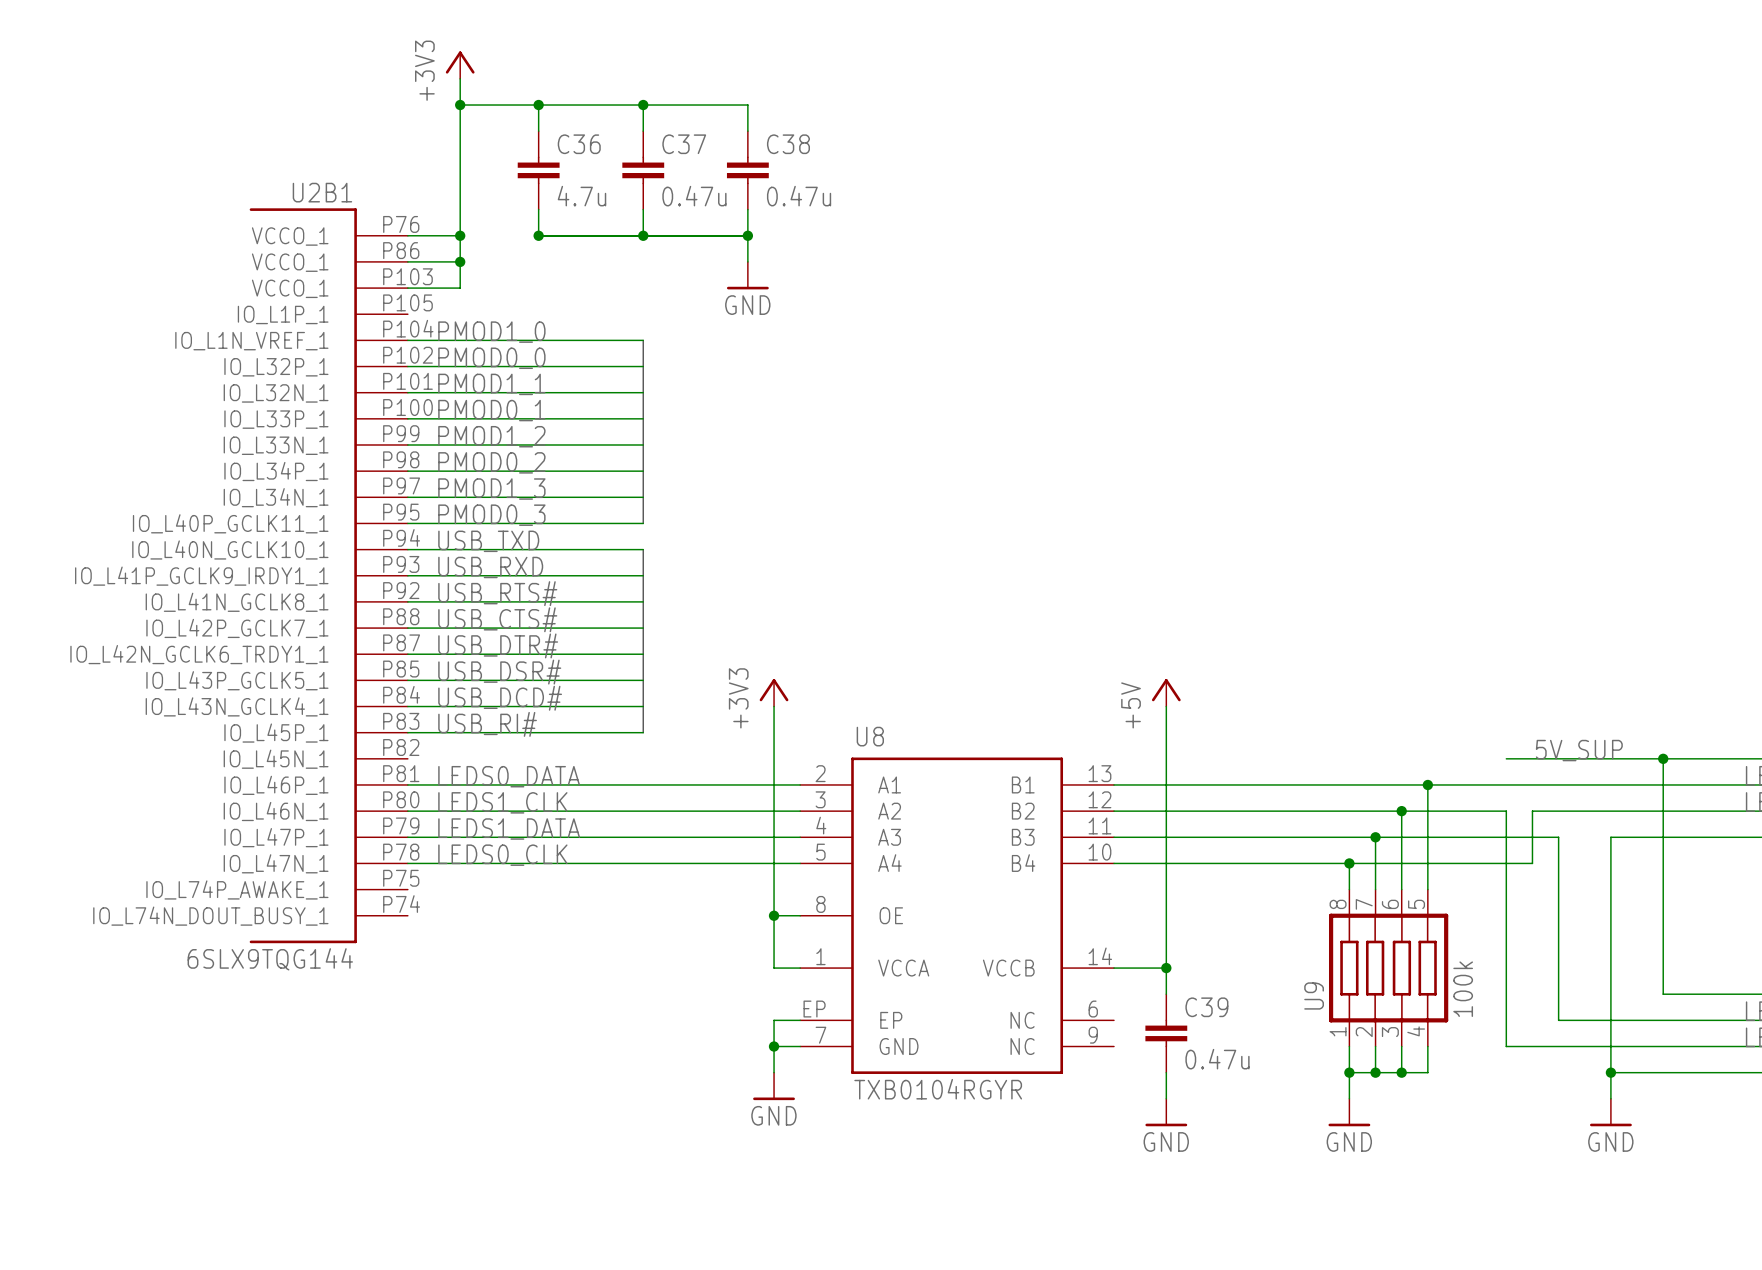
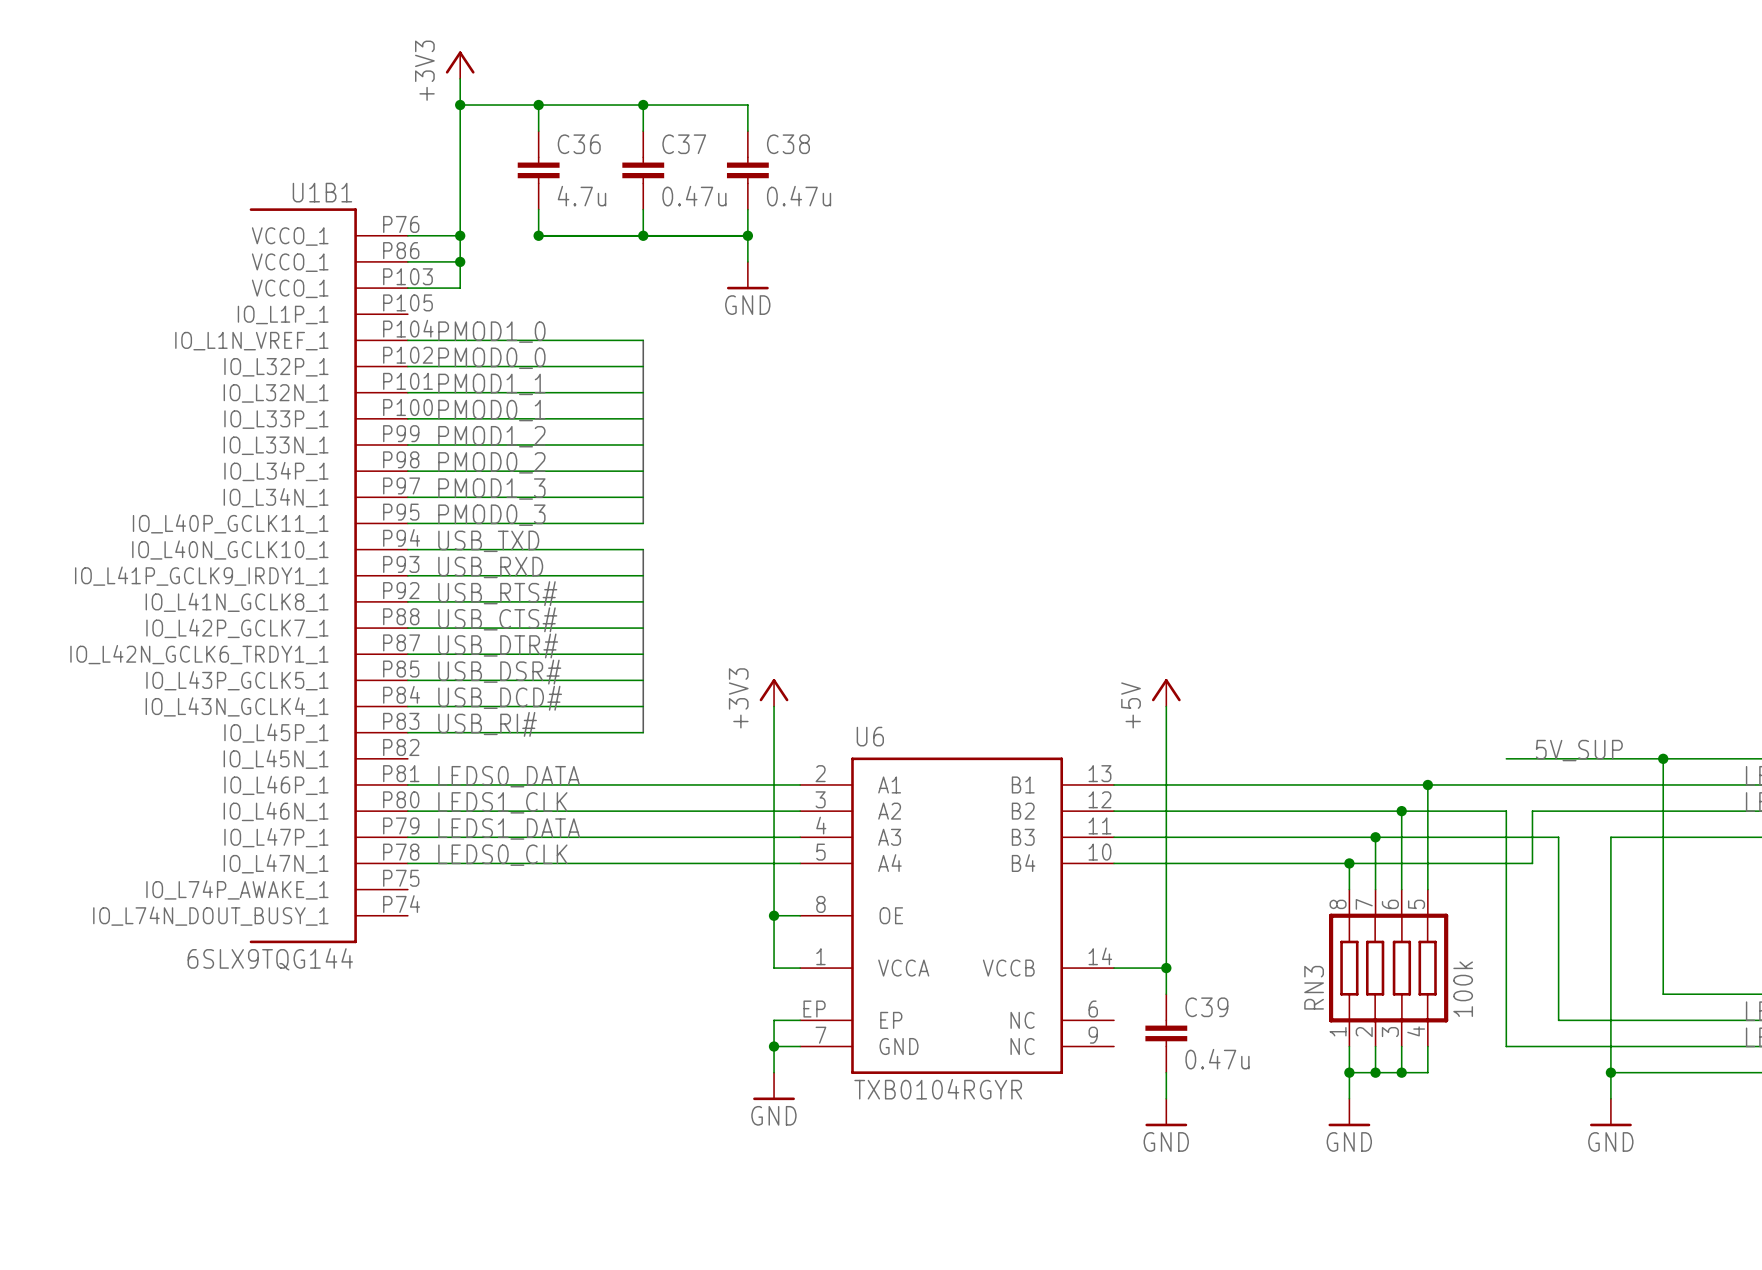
U2B1 name: U2B1 (322, 192) -> U1B1 (322, 192)
U8 name: U8 (870, 736) -> U6 (870, 736)
U9 name: U9 (1314, 995) -> RN3 (1314, 987)

